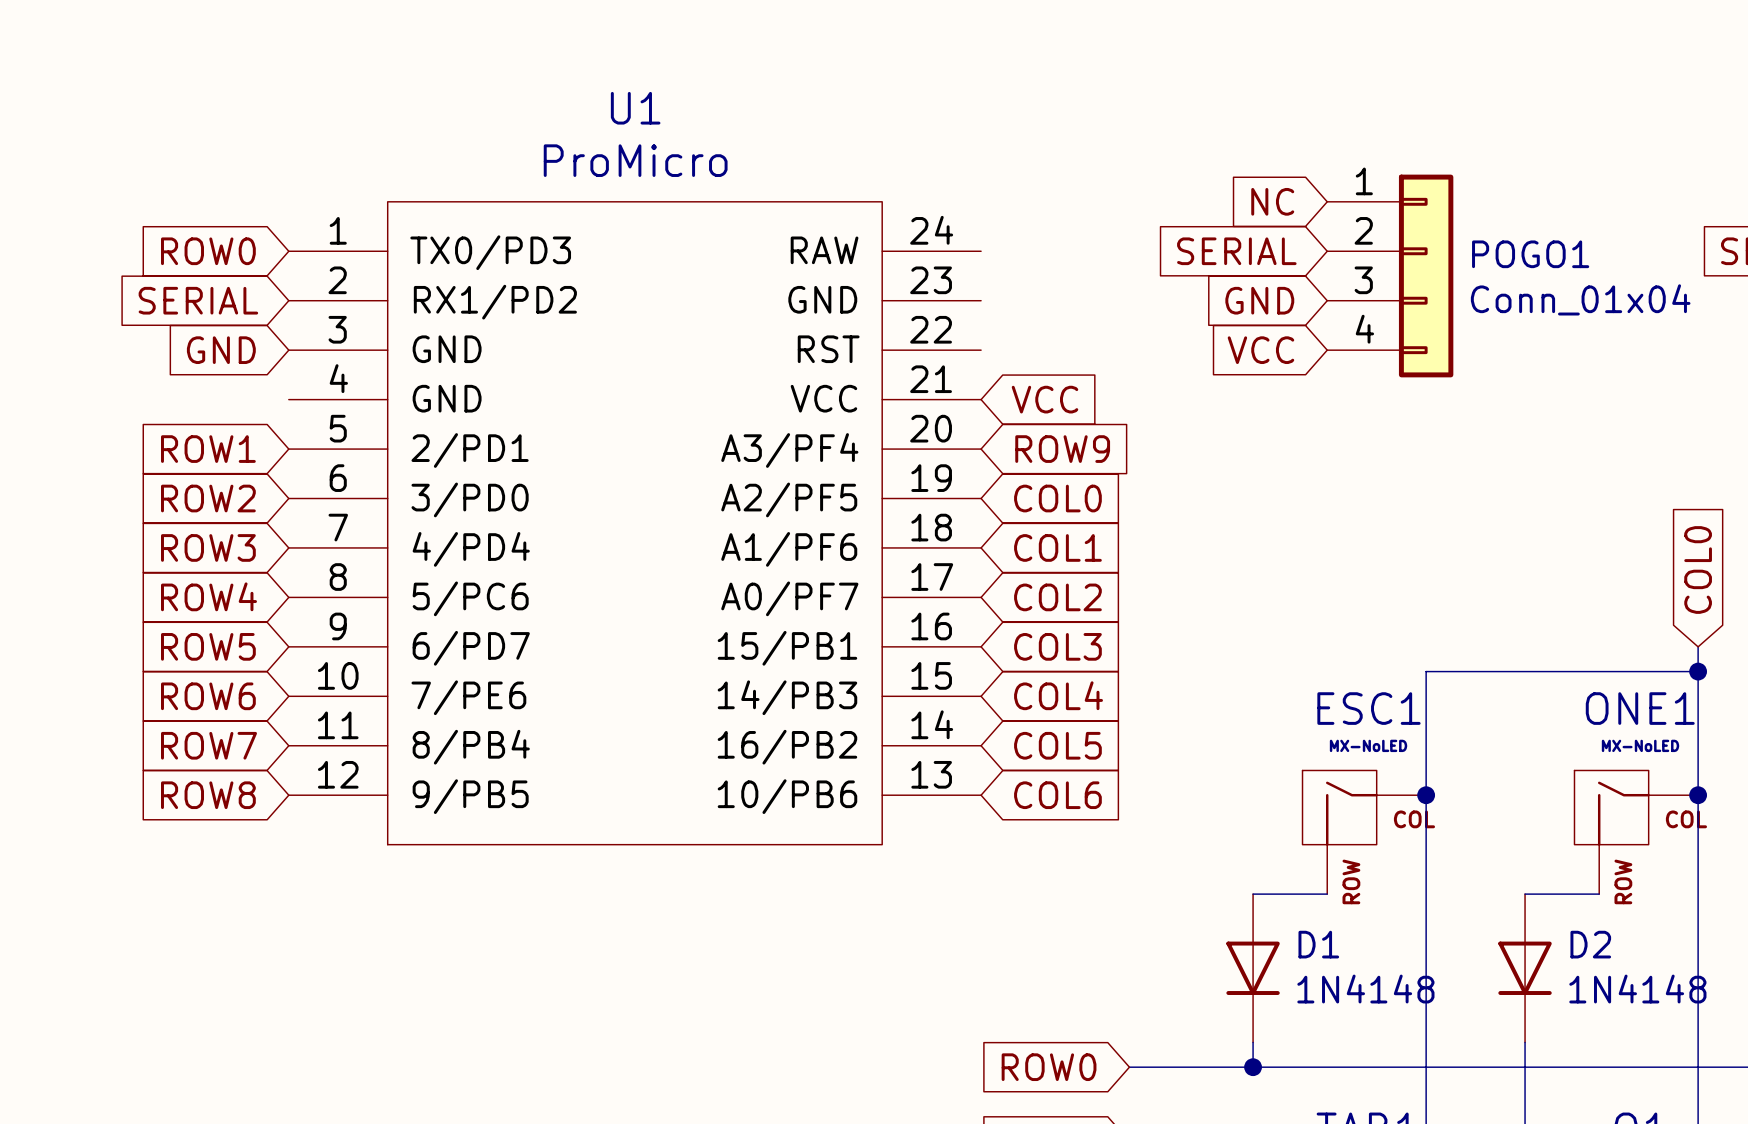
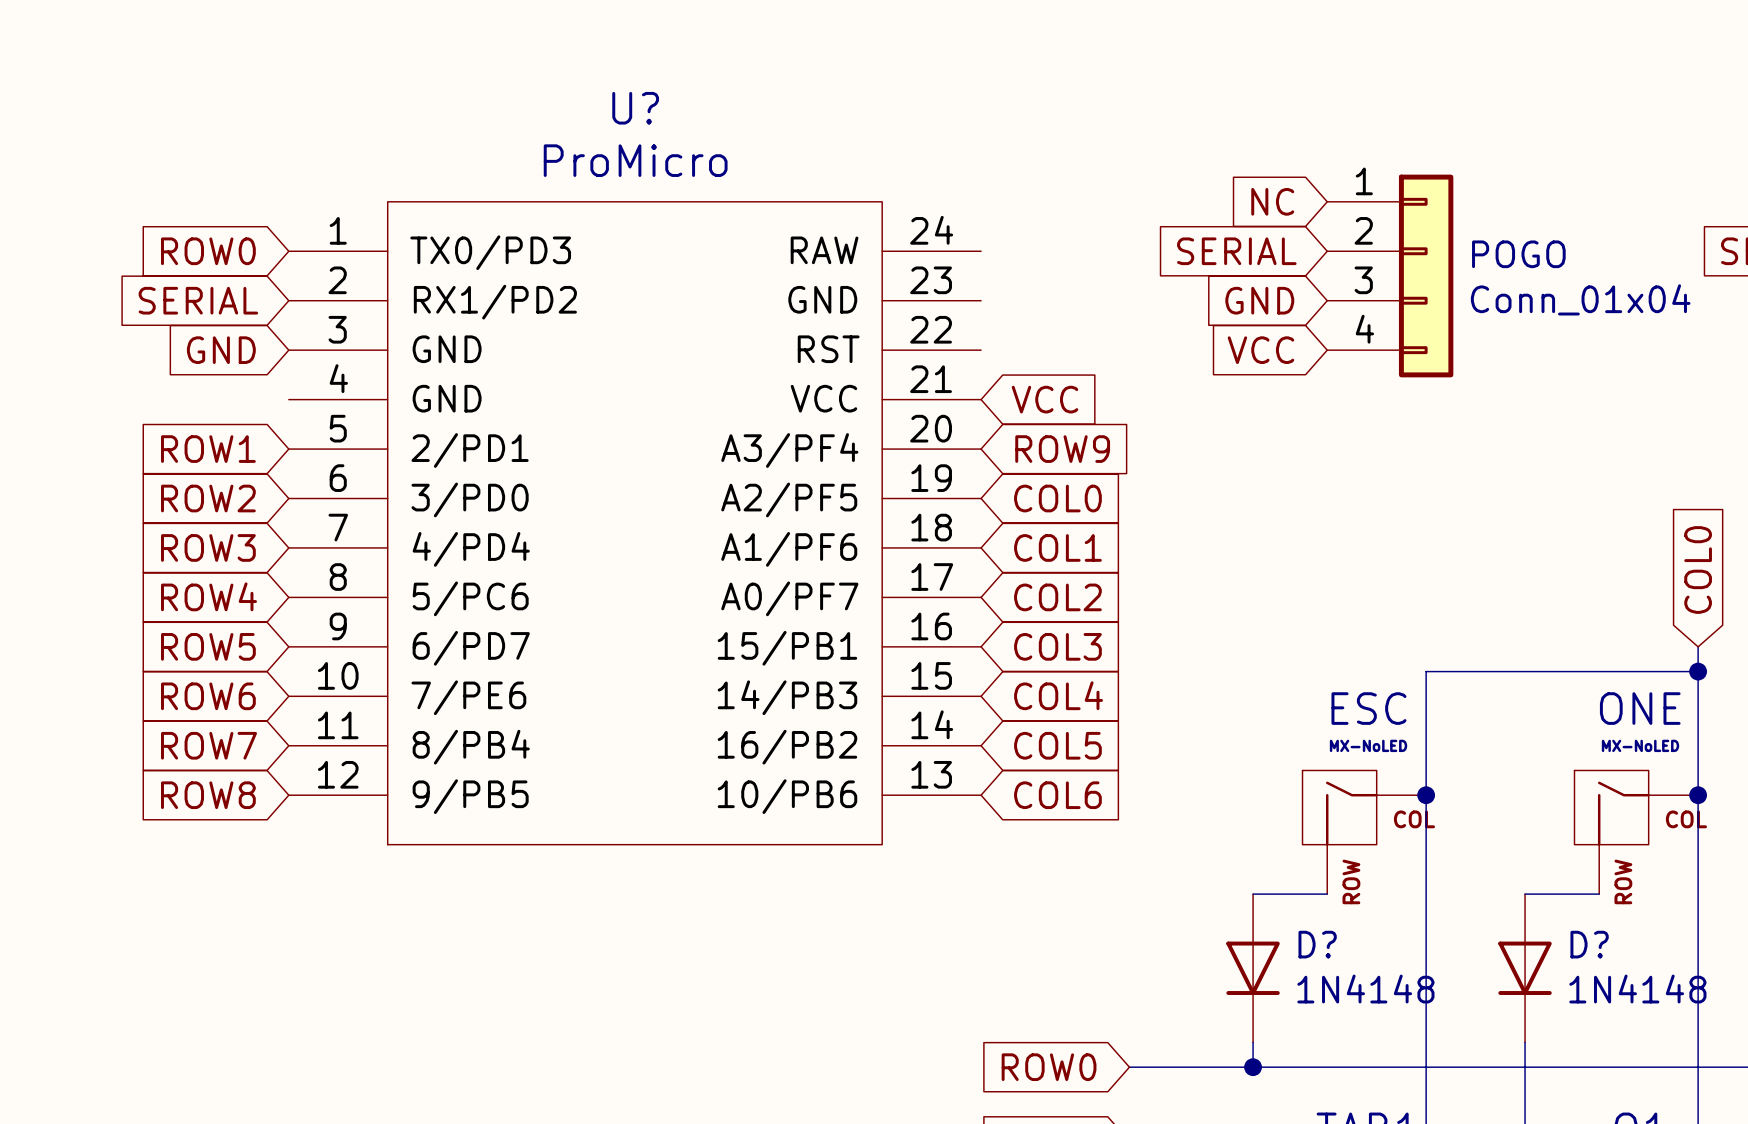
U1 name: U1 (635, 108) -> U? (635, 108)
POGO1 name: POGO1 (1530, 254) -> POGO (1518, 254)
ESC1 name: ESC1 (1368, 708) -> ESC (1368, 708)
ONE1 name: ONE1 (1640, 708) -> ONE (1640, 708)
D1 name: D1 (1318, 944) -> D? (1317, 944)
D2 name: D2 (1590, 944) -> D? (1589, 944)

